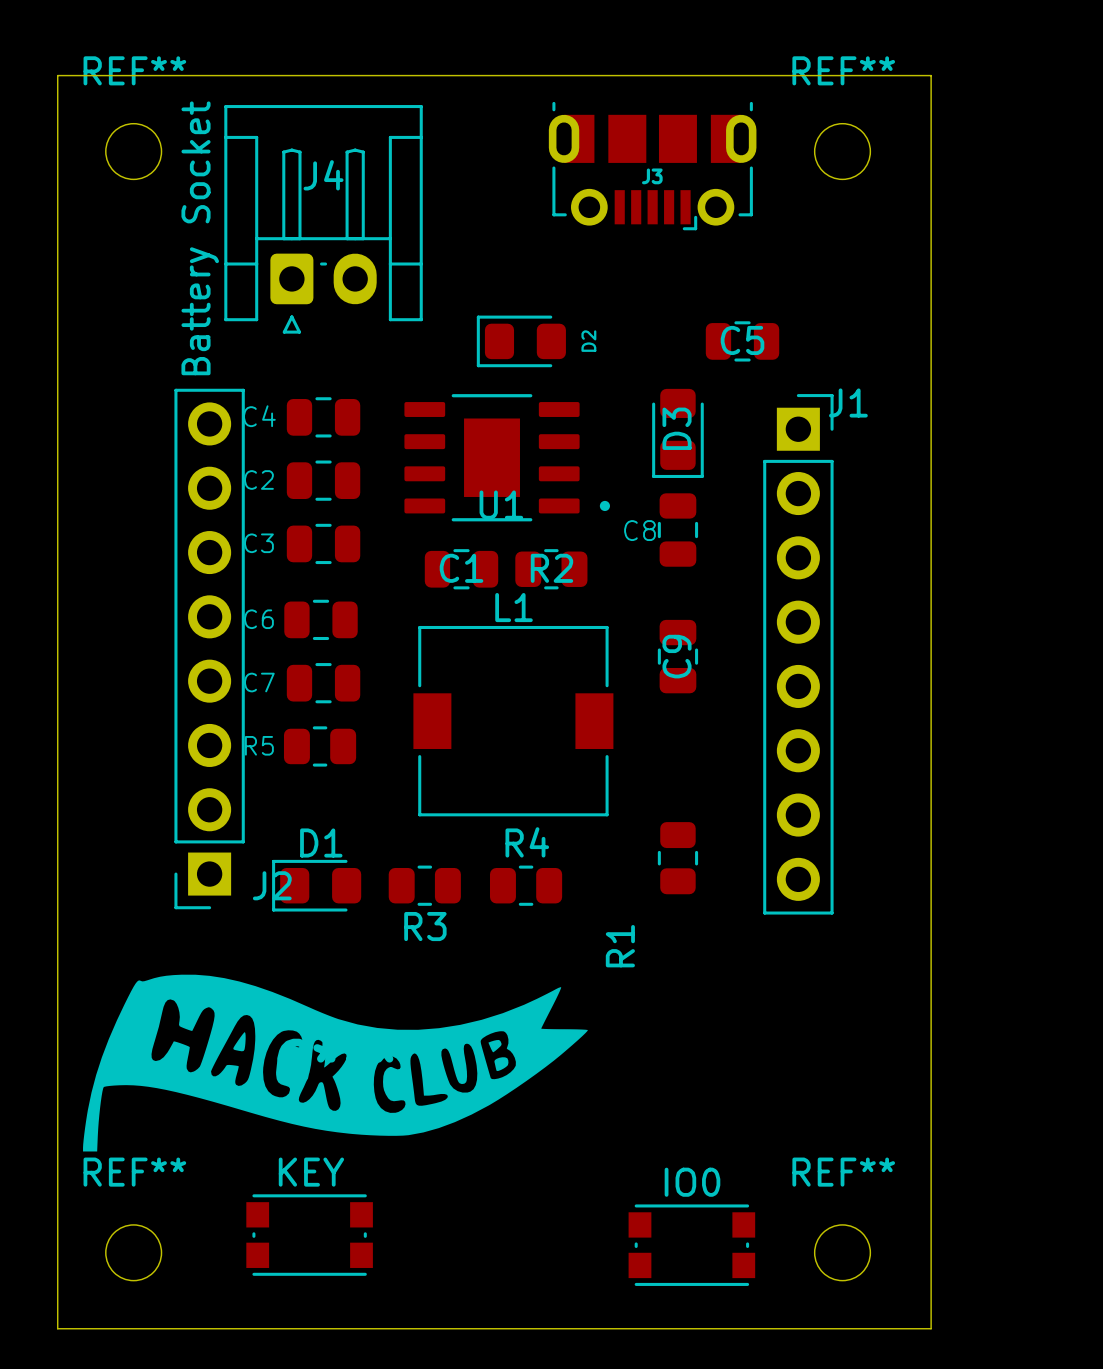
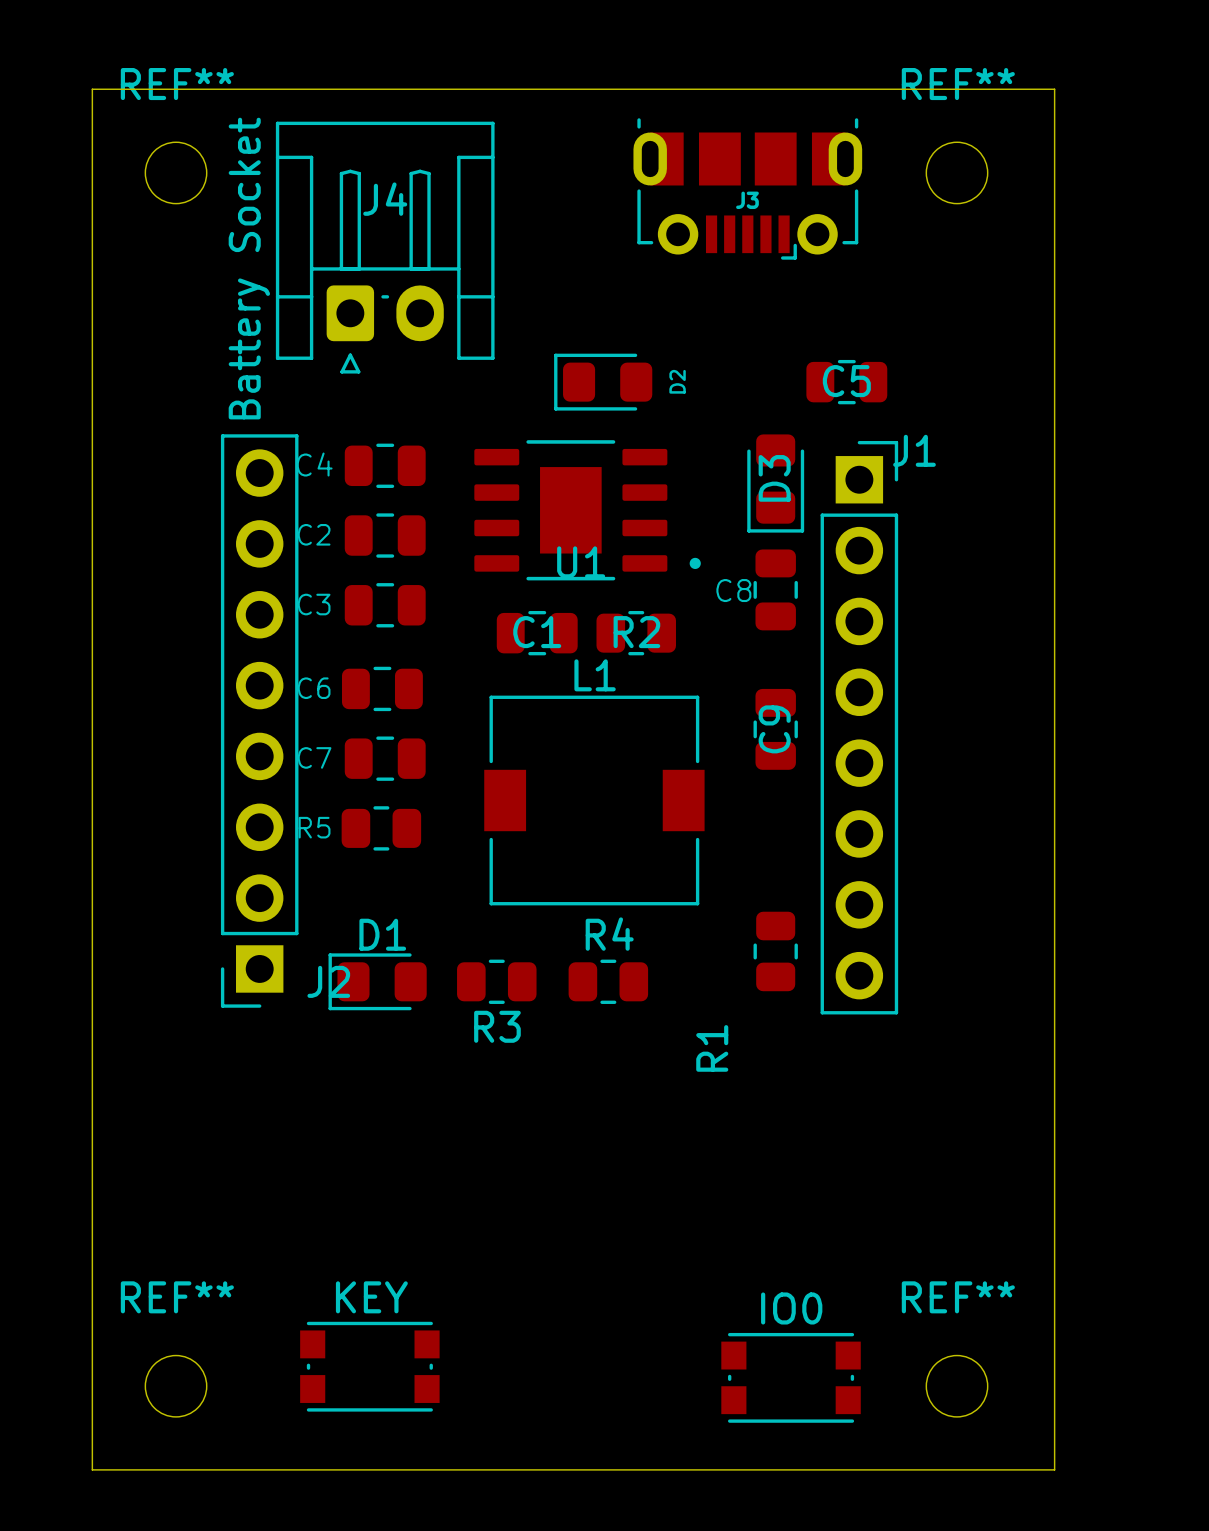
J1 position: (798, 654) -> (859, 727)
part: (335, 1063) -> none

